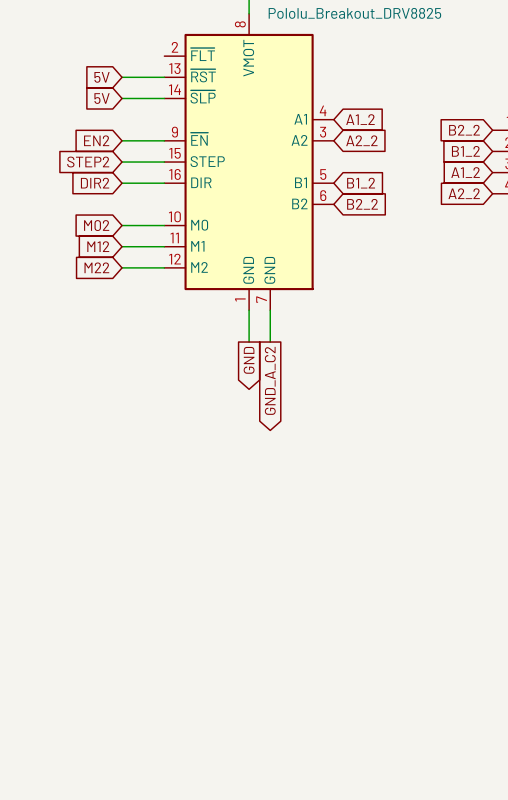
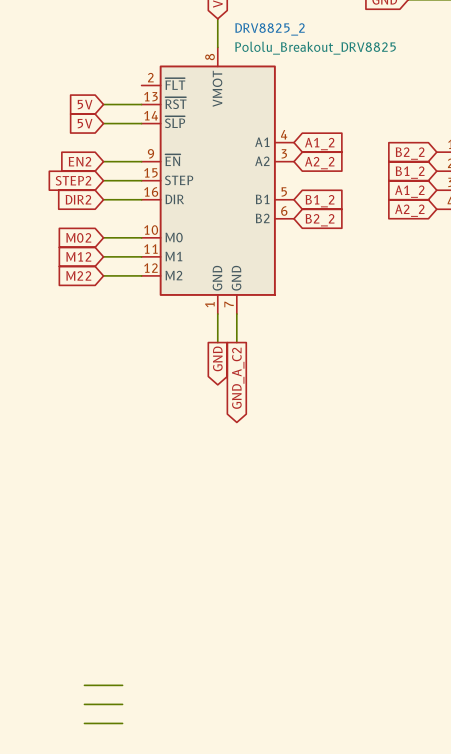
wire: none -> (84, 685) (122, 685)
wire: none -> (84, 704) (122, 704)
wire: none -> (84, 723) (122, 723)

